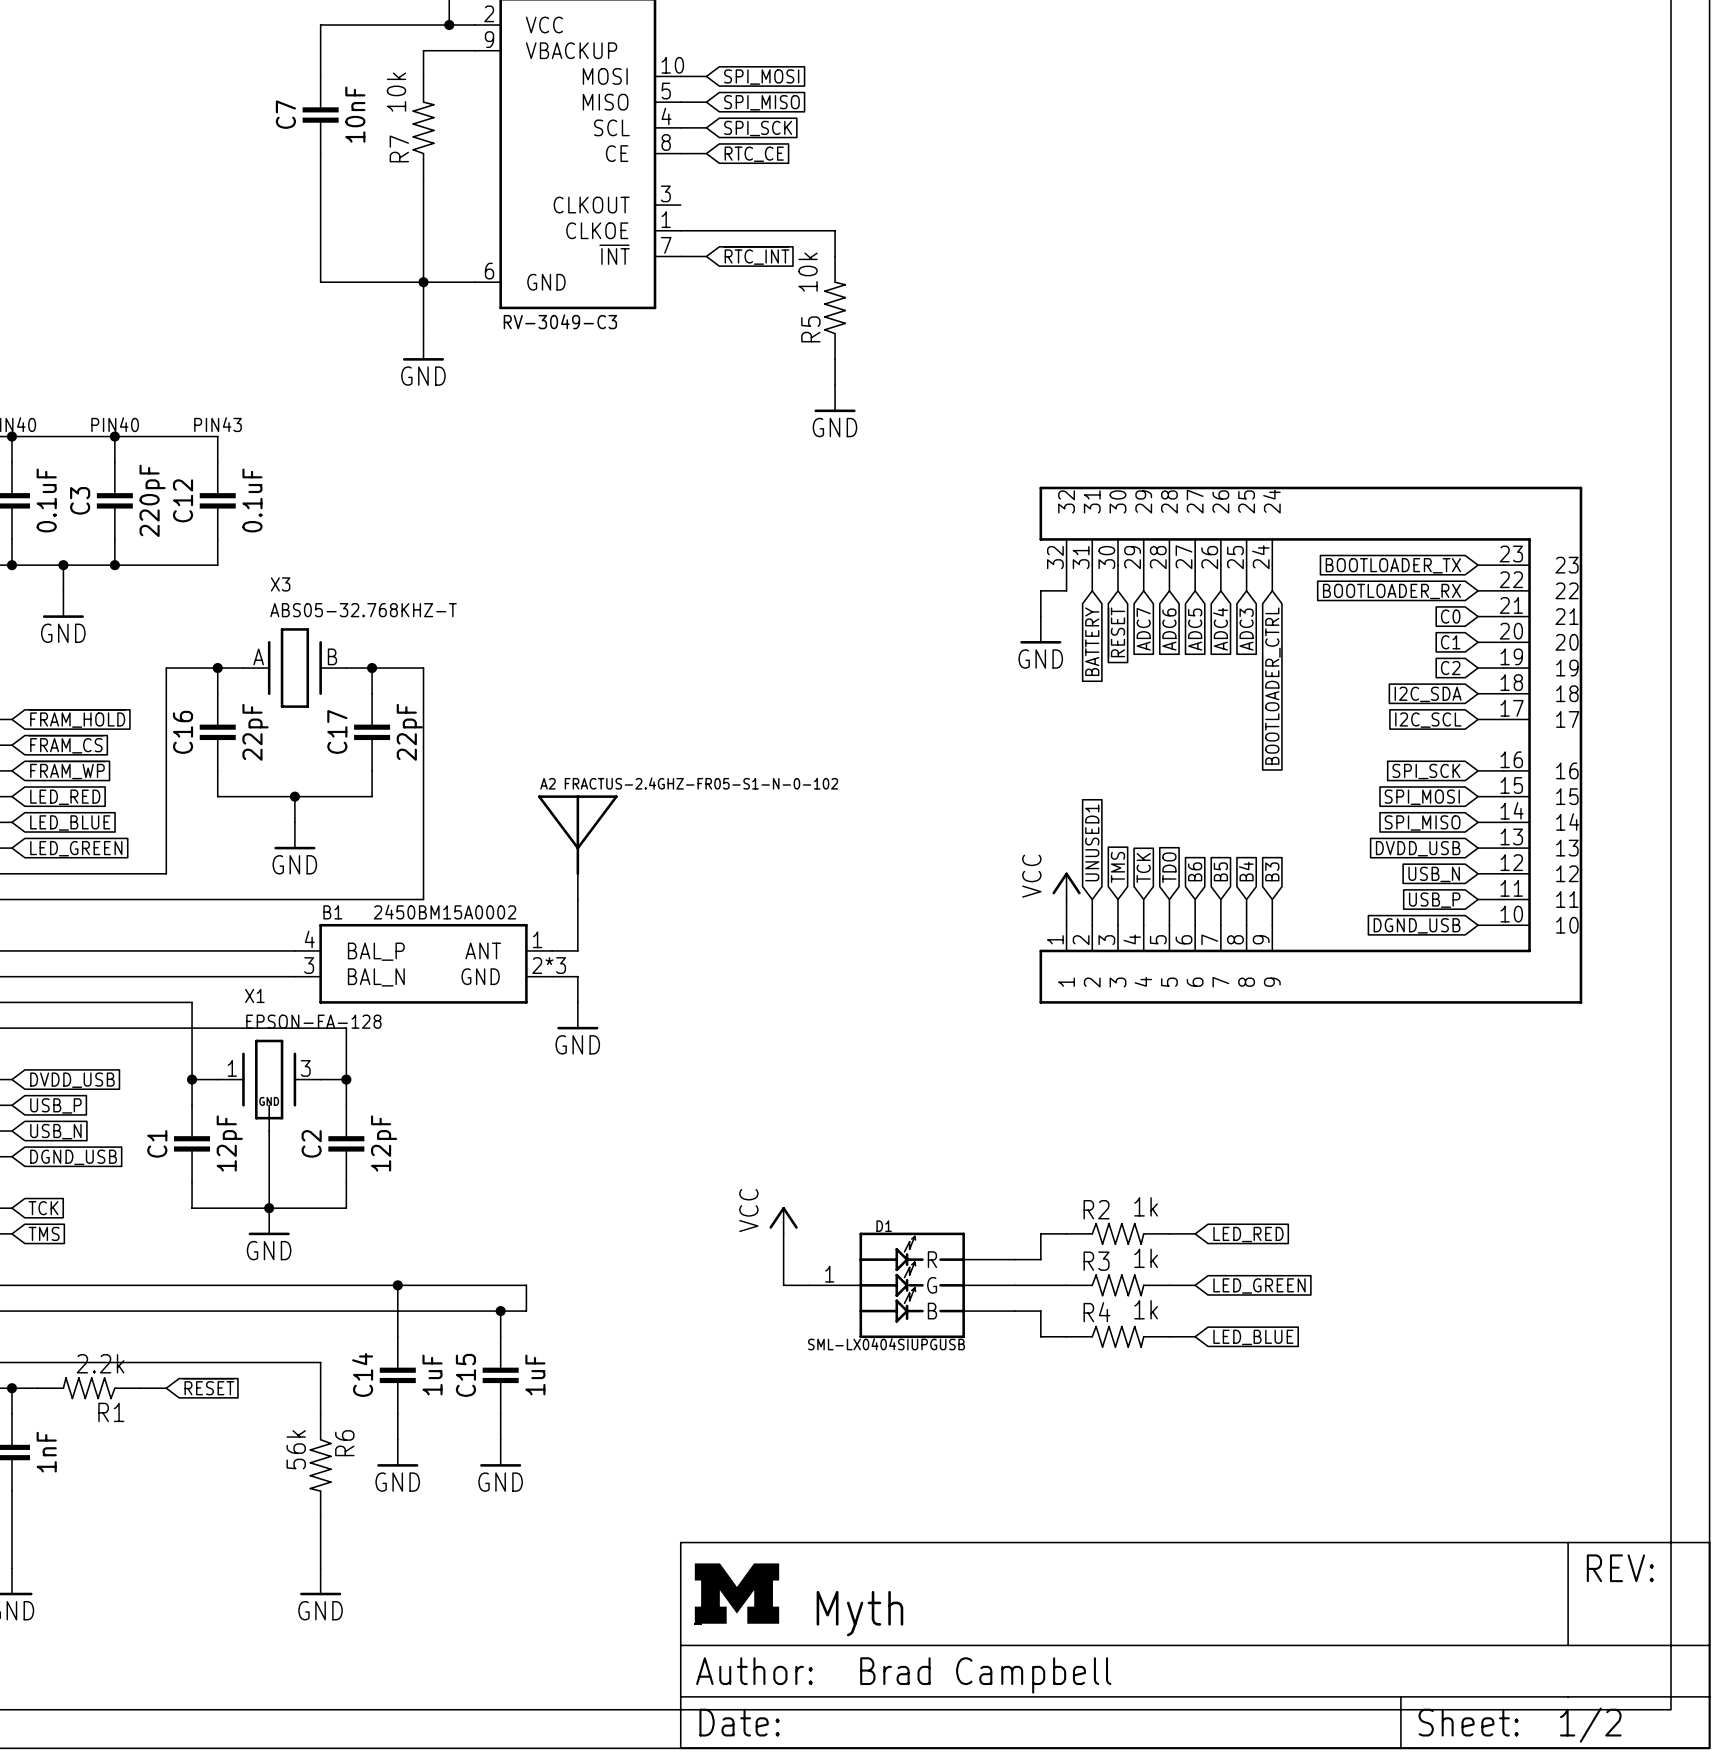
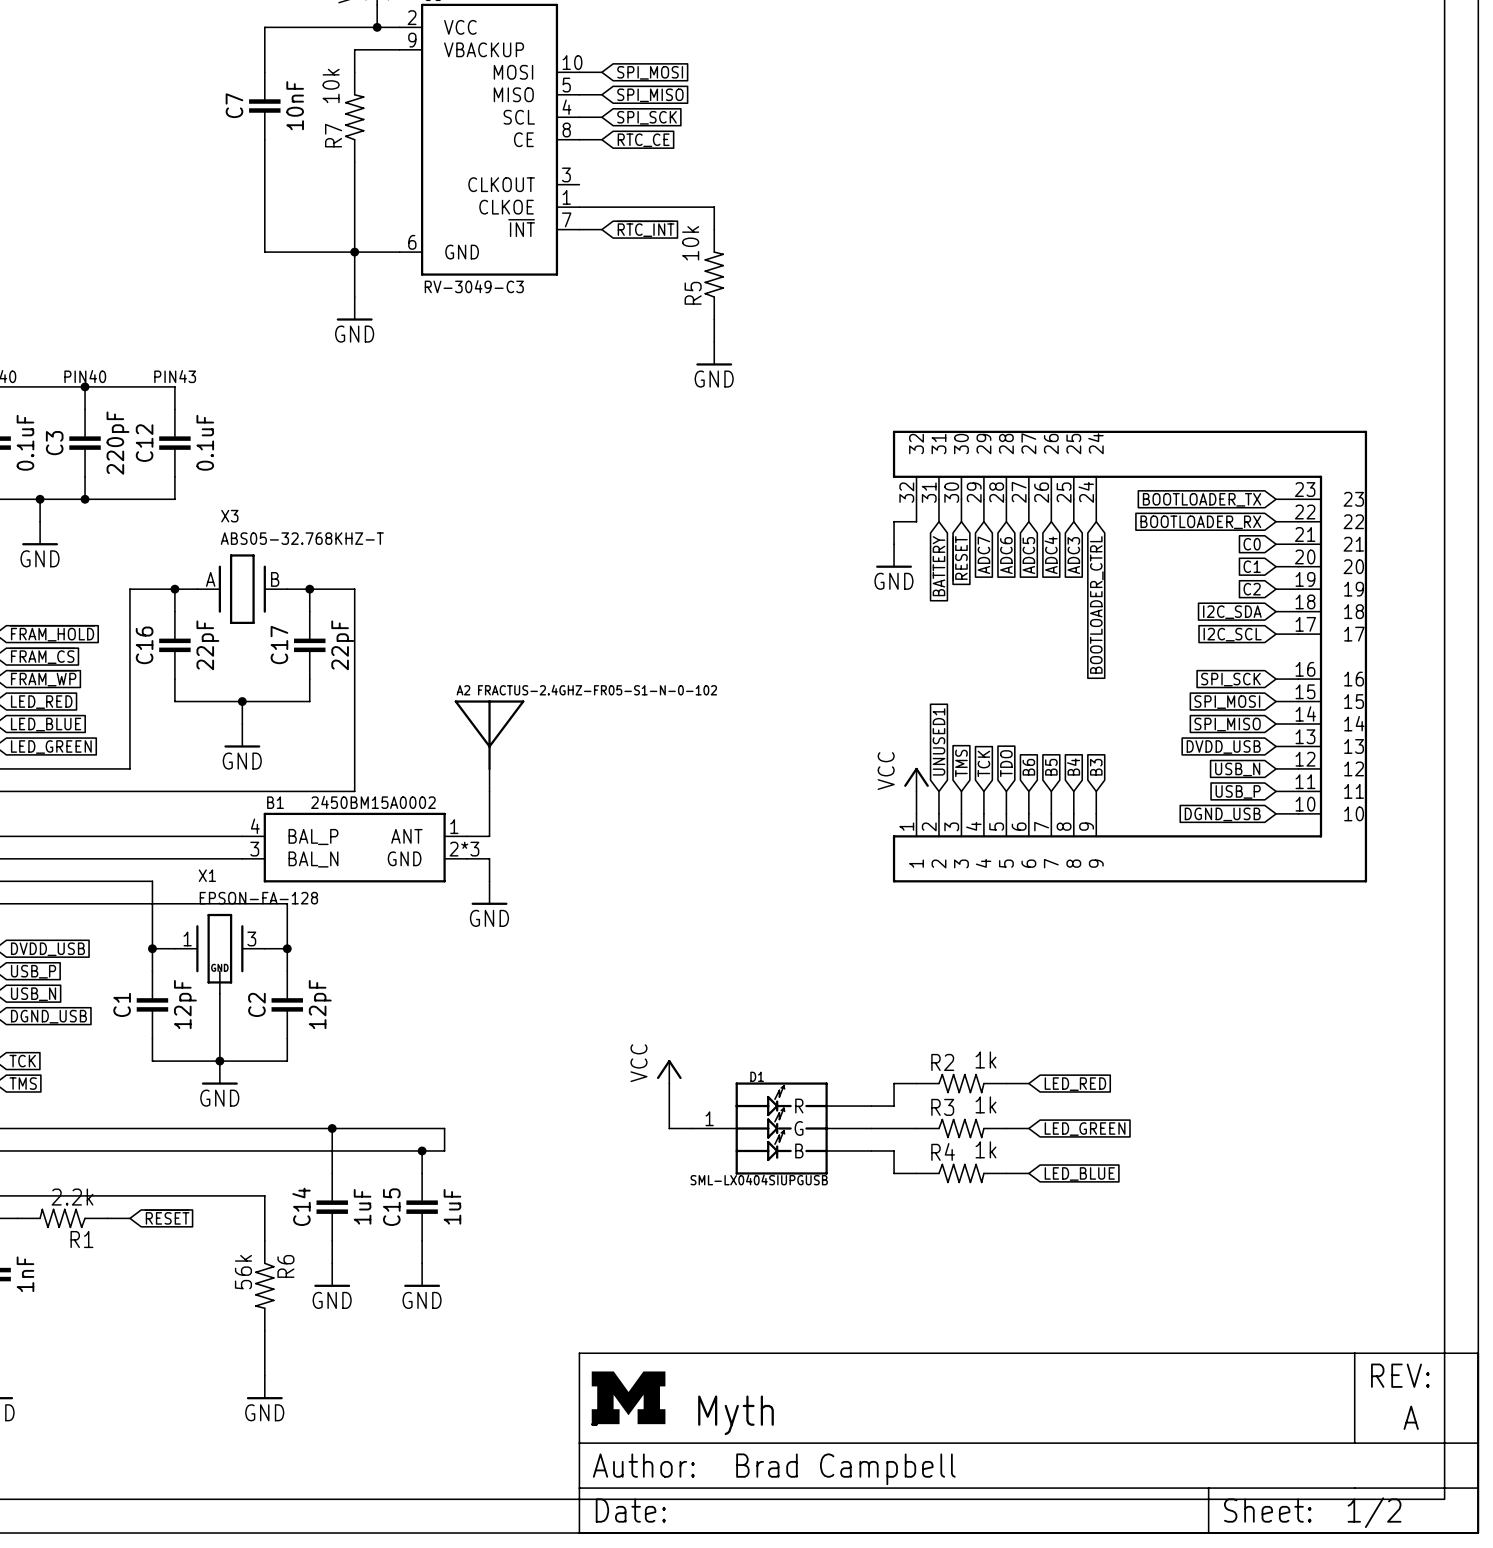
part text: none -> A (1411, 1417)

